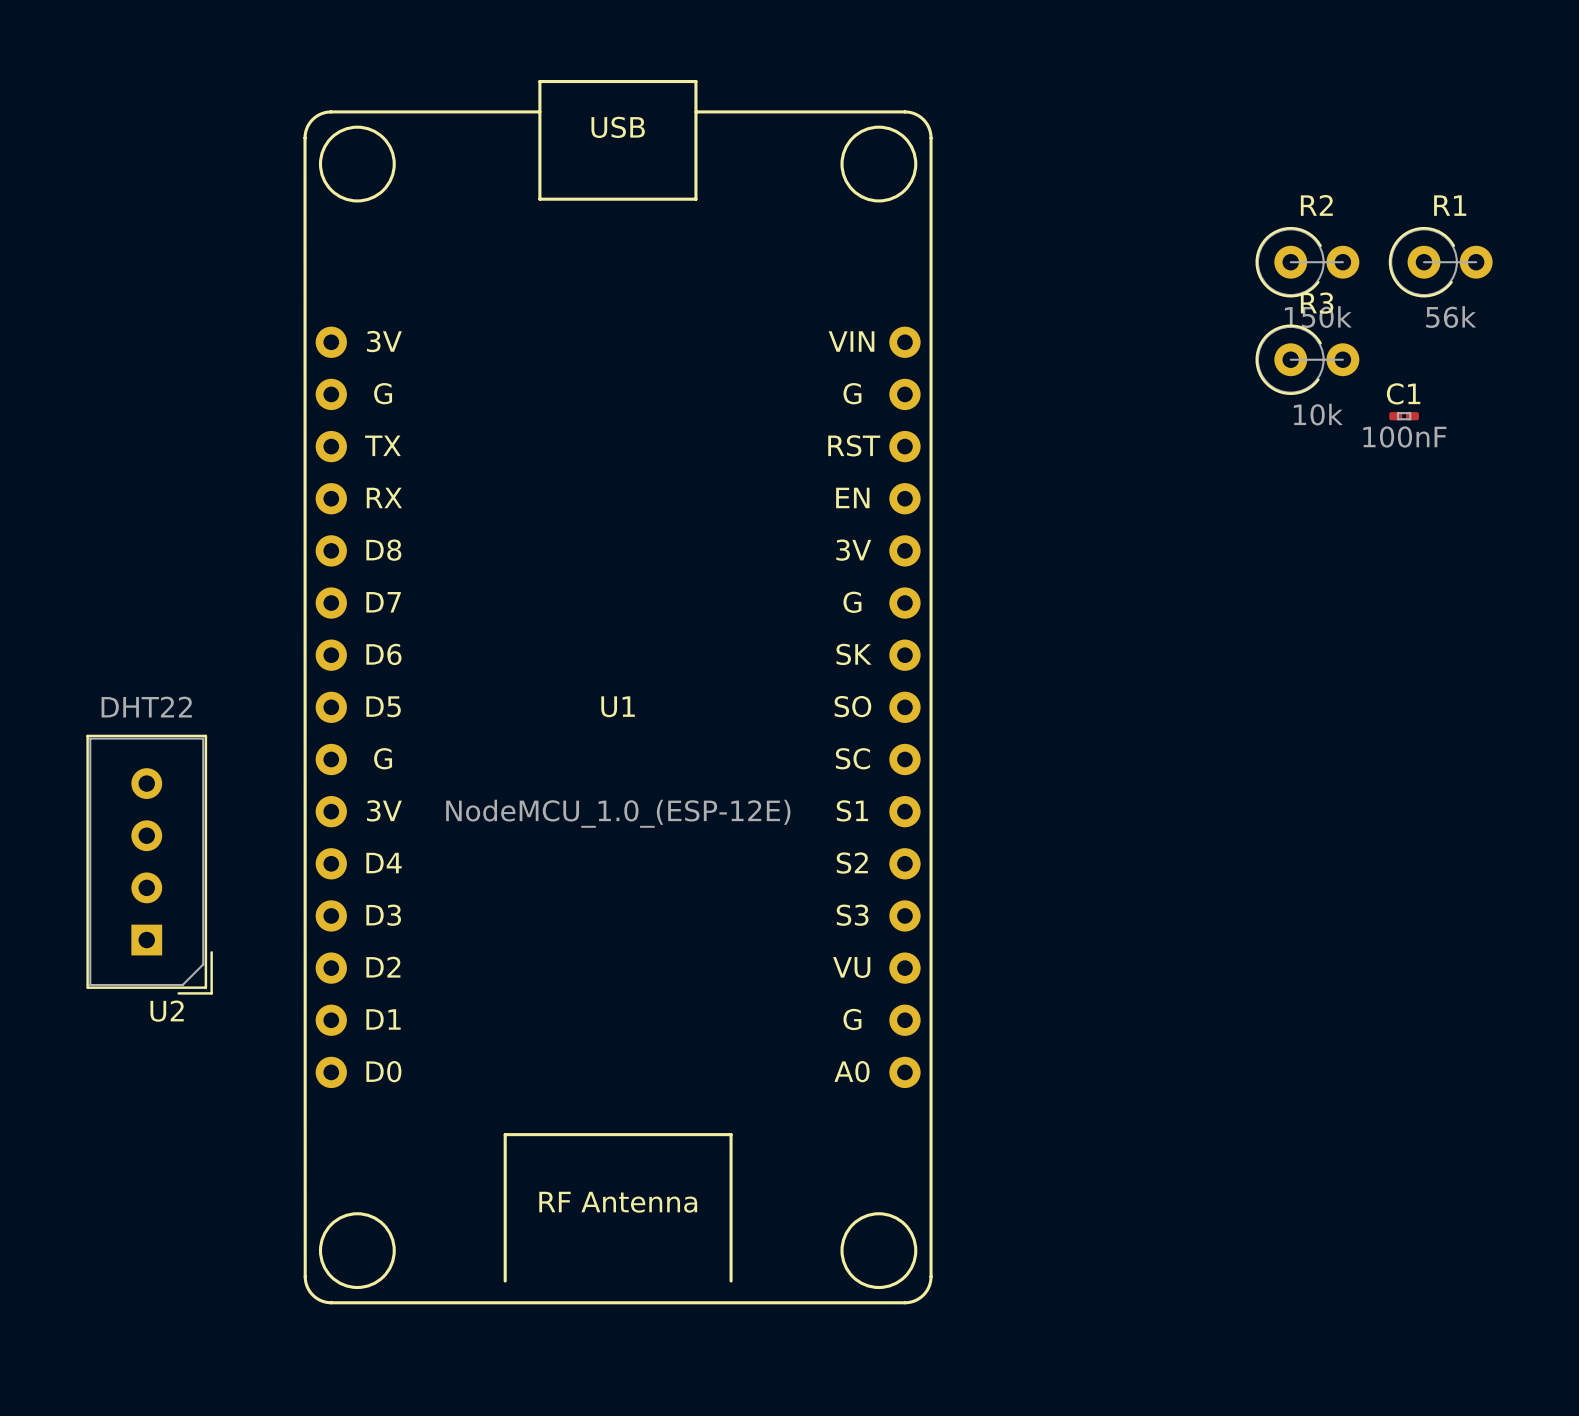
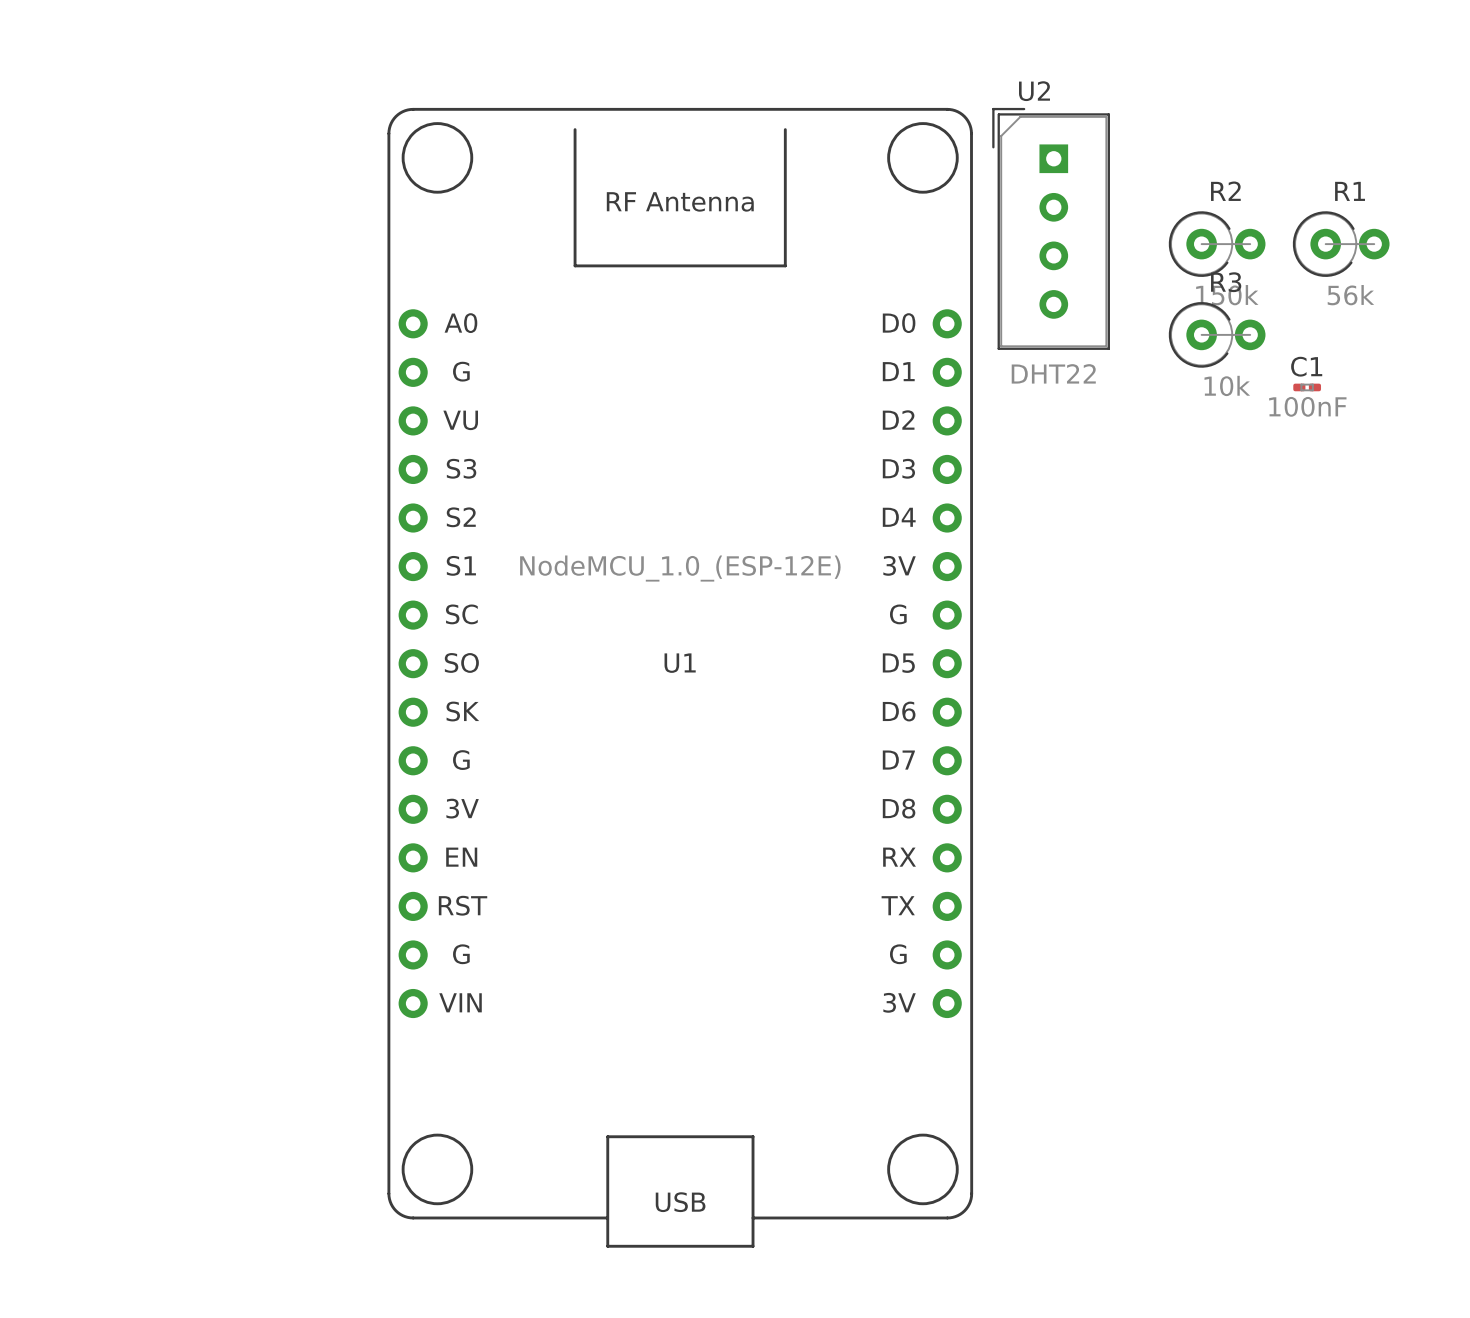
U1 rotation: 0° (618, 692) -> 180° (680, 677)
U2 rotation: 0° (149, 864) -> 180° (1051, 228)
U2 position: (149, 864) -> (1051, 228)

